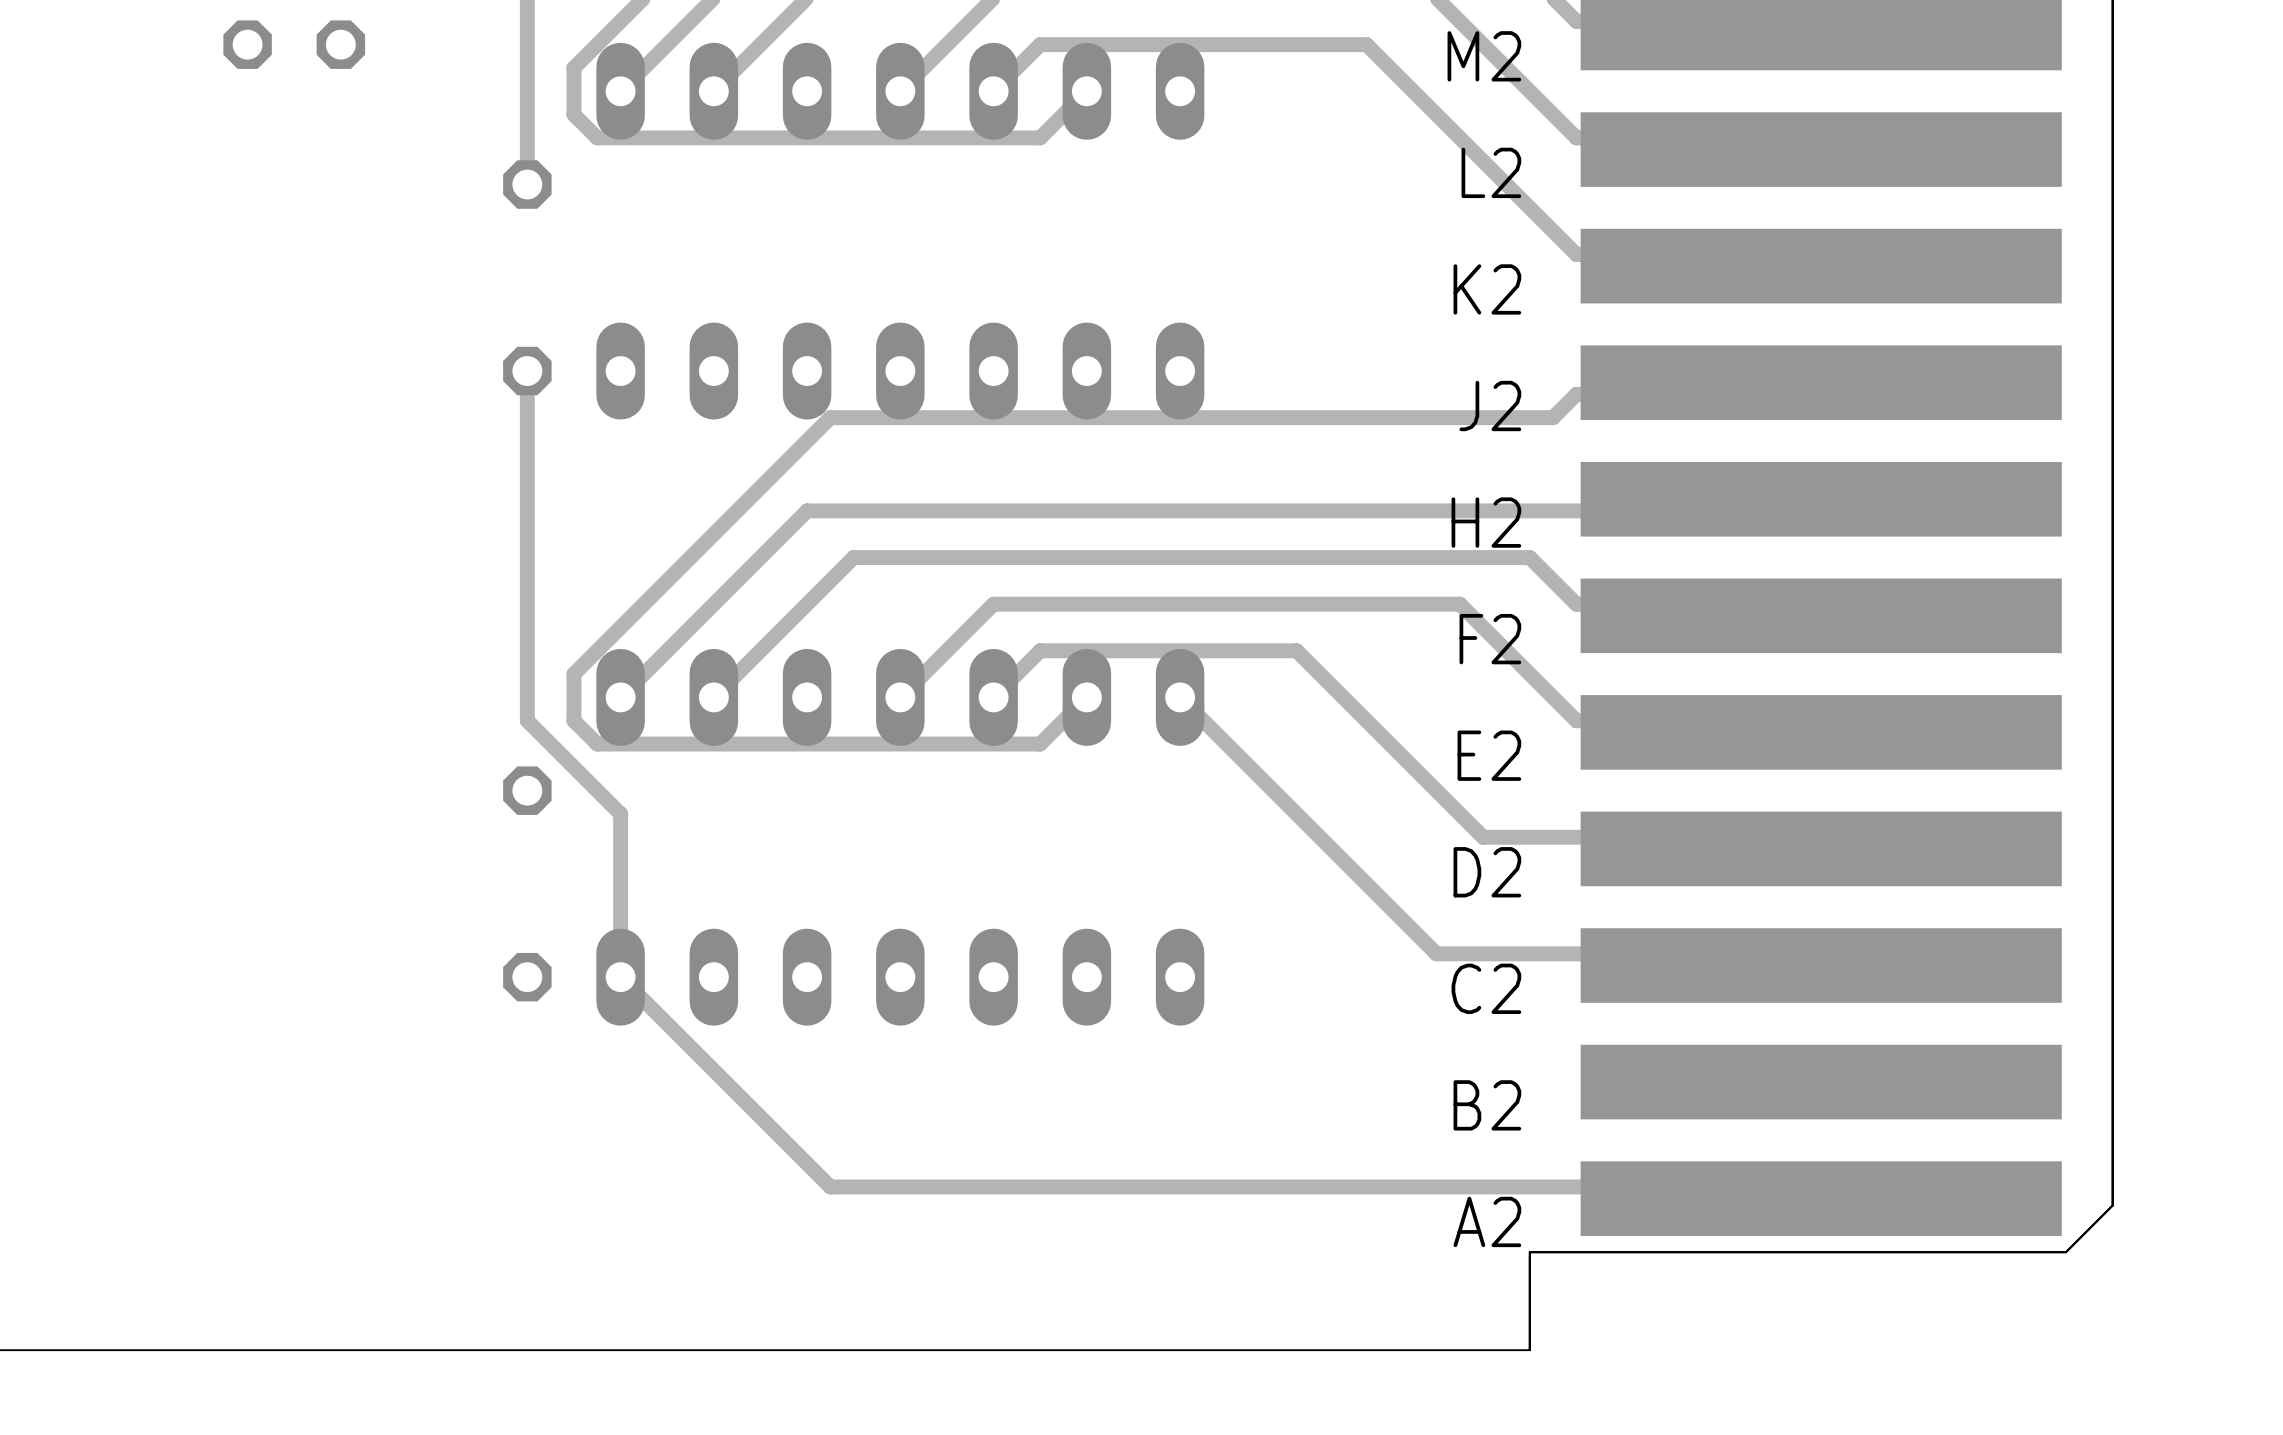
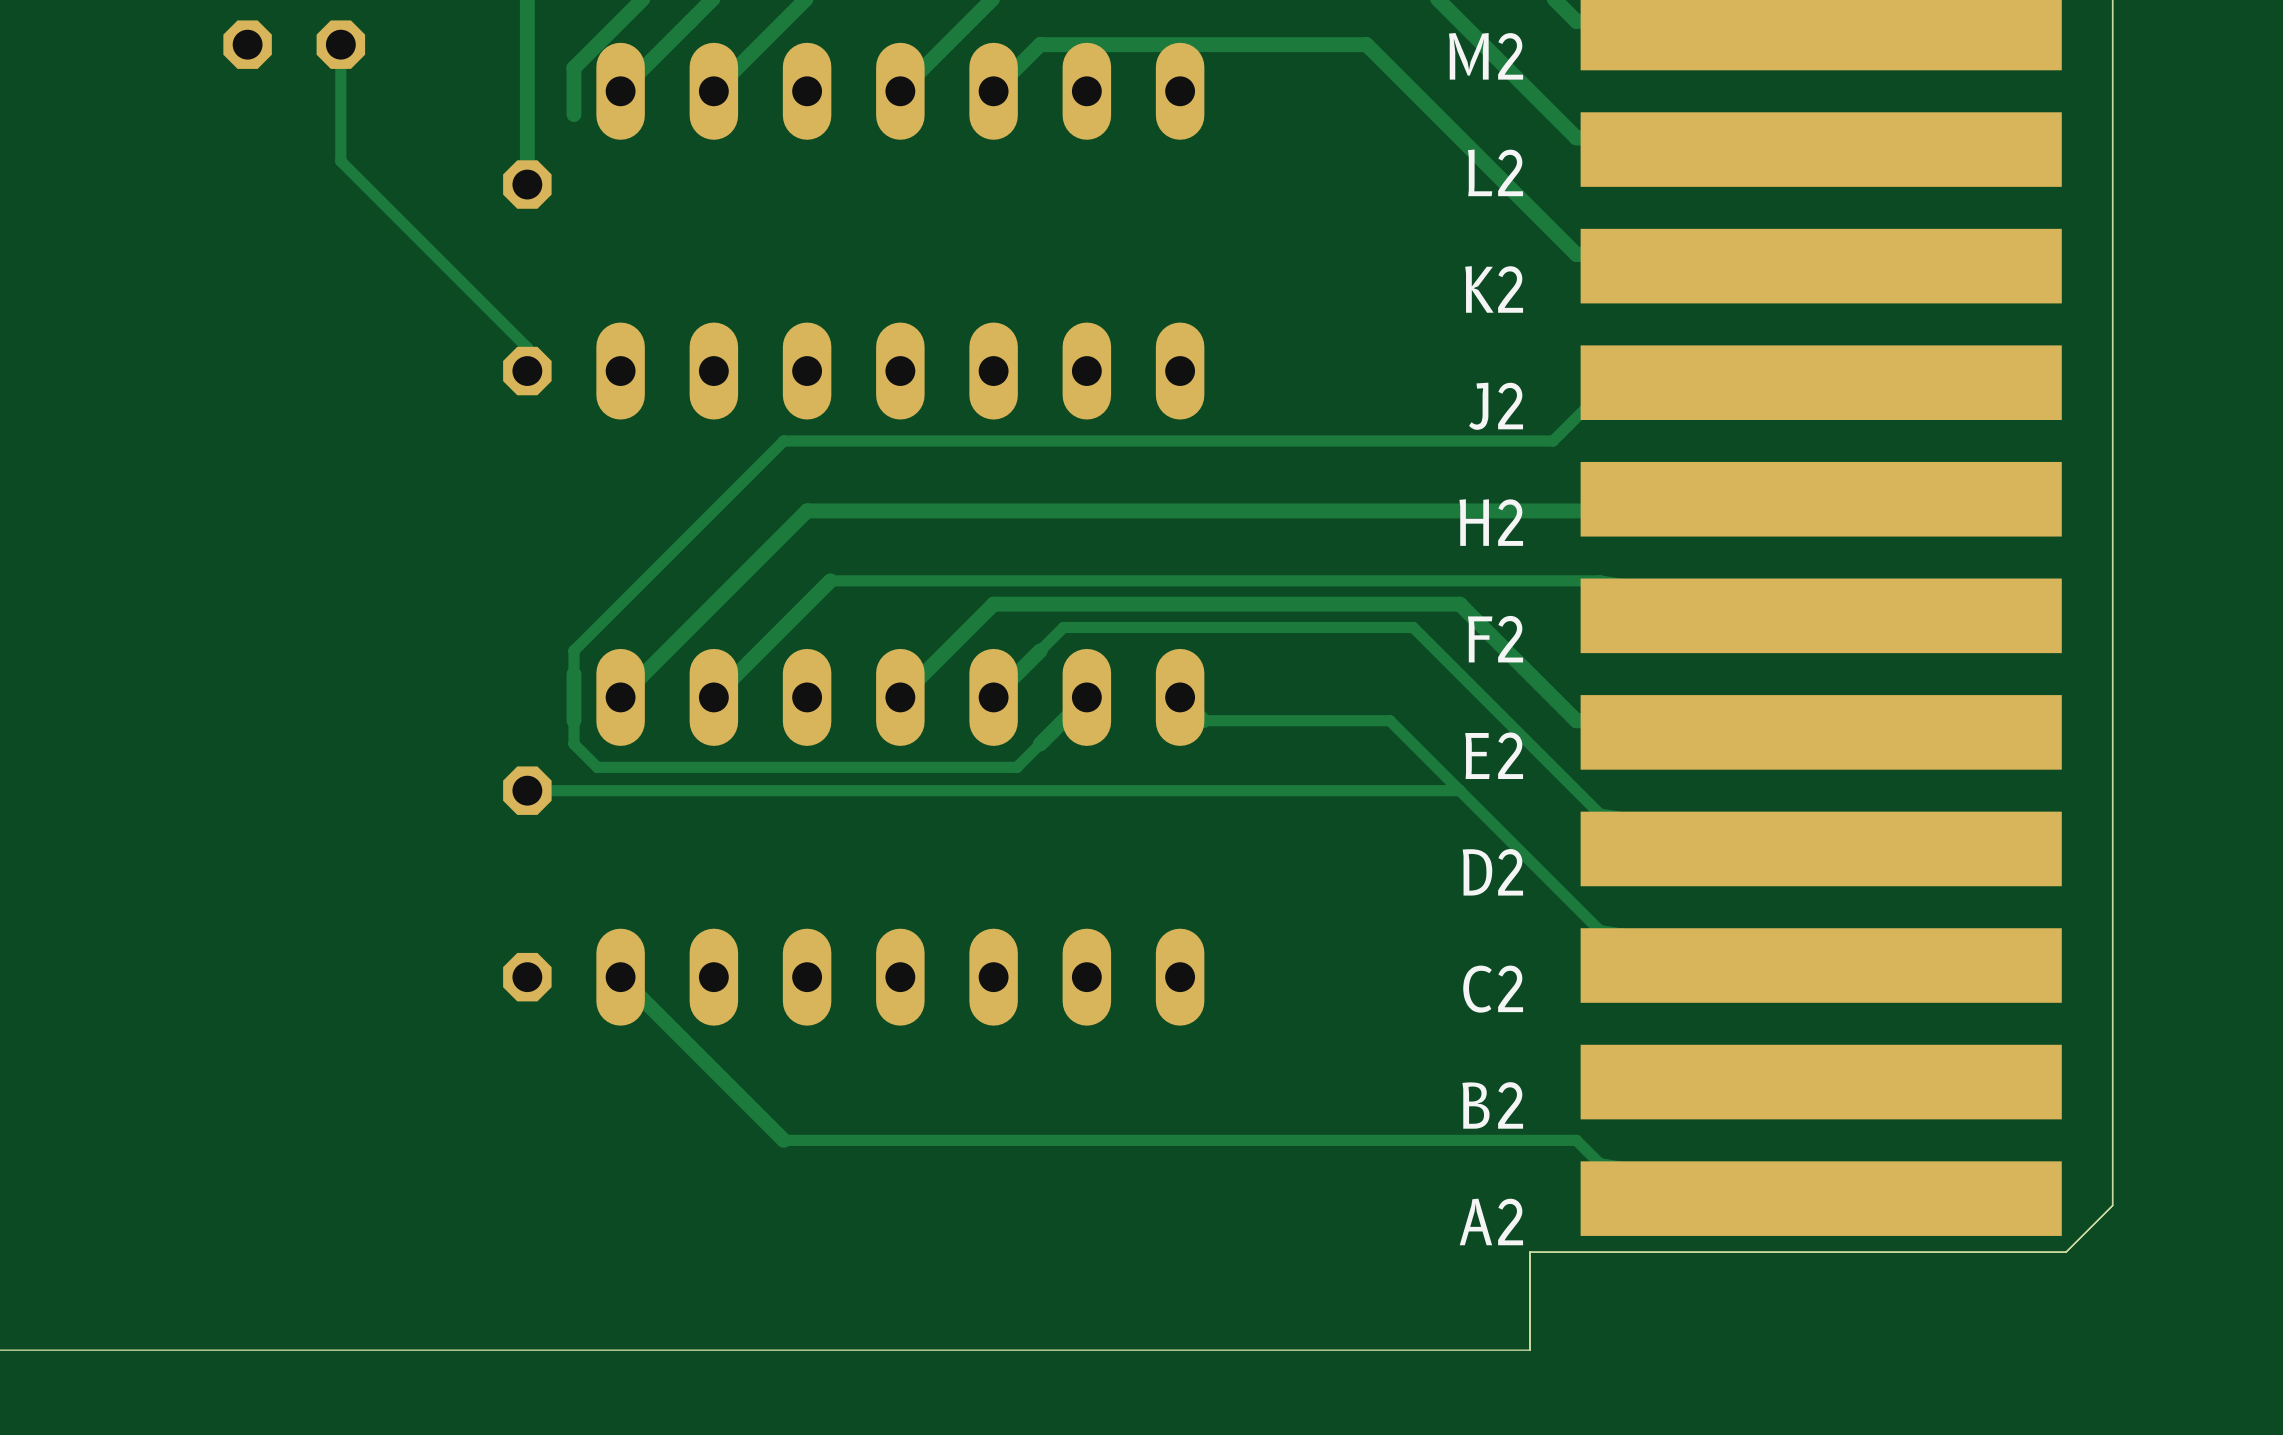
track: (1086, 91) (1040, 137) (597, 137) (573, 114) -> none
track: (527, 371) (527, 720) (620, 813) (620, 977) -> (527, 371) (527, 347) (340, 161) (340, 44)
track: (1821, 382) (1809, 394) (1576, 394) (1553, 417) (830, 417) (573, 674) -> (1821, 382) (1599, 394) (1553, 440) (783, 440) (573, 650) (573, 674)
track: (830, 580) (853, 557) (1529, 557) (1576, 604) (1809, 604) (1821, 615) -> (830, 580) (1599, 580) (1821, 615)
track: (1040, 650) (1296, 650) (1483, 837) (1809, 837) (1821, 848) -> (1040, 650) (1063, 627) (1413, 627) (1599, 813) (1821, 848)
track: (573, 720) (597, 744) (1040, 744) -> (573, 720) (573, 744) (597, 767) (1016, 767) (1040, 744)
track: (1203, 720) (1436, 953) (1809, 953) (1821, 965) -> (1203, 720) (1389, 720) (1599, 930) (1821, 965)
track: none -> (1459, 790) (527, 790)
track: (783, 1140) (830, 1186) (1809, 1186) (1821, 1198) -> (783, 1140) (1576, 1140) (1599, 1163) (1821, 1198)

